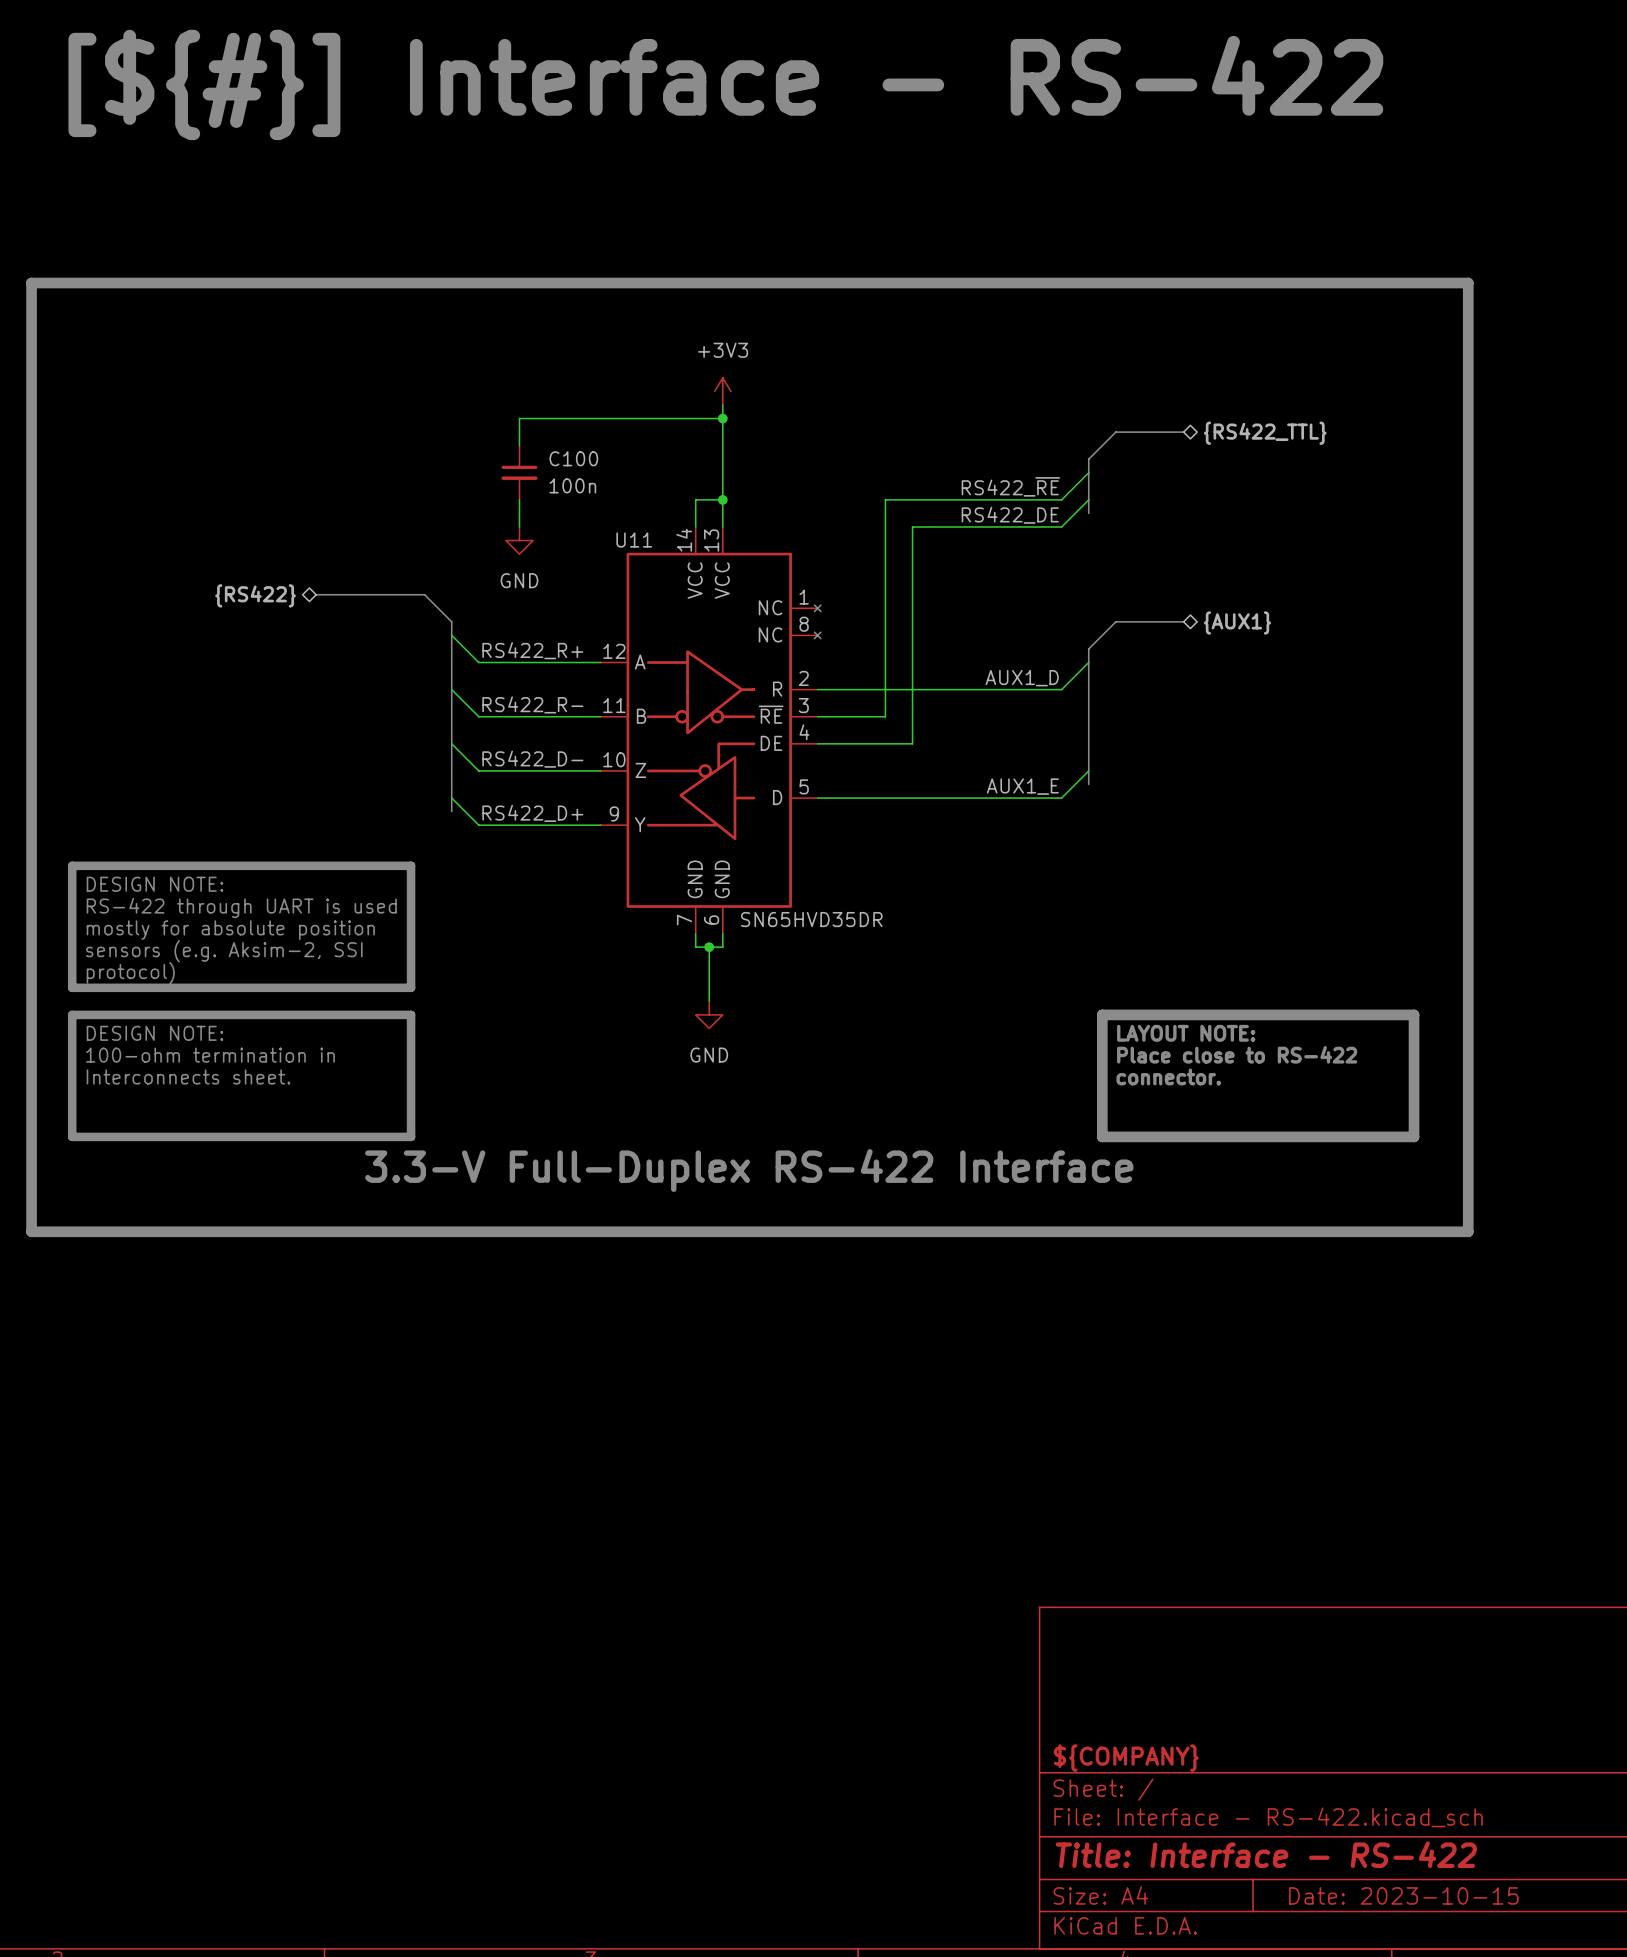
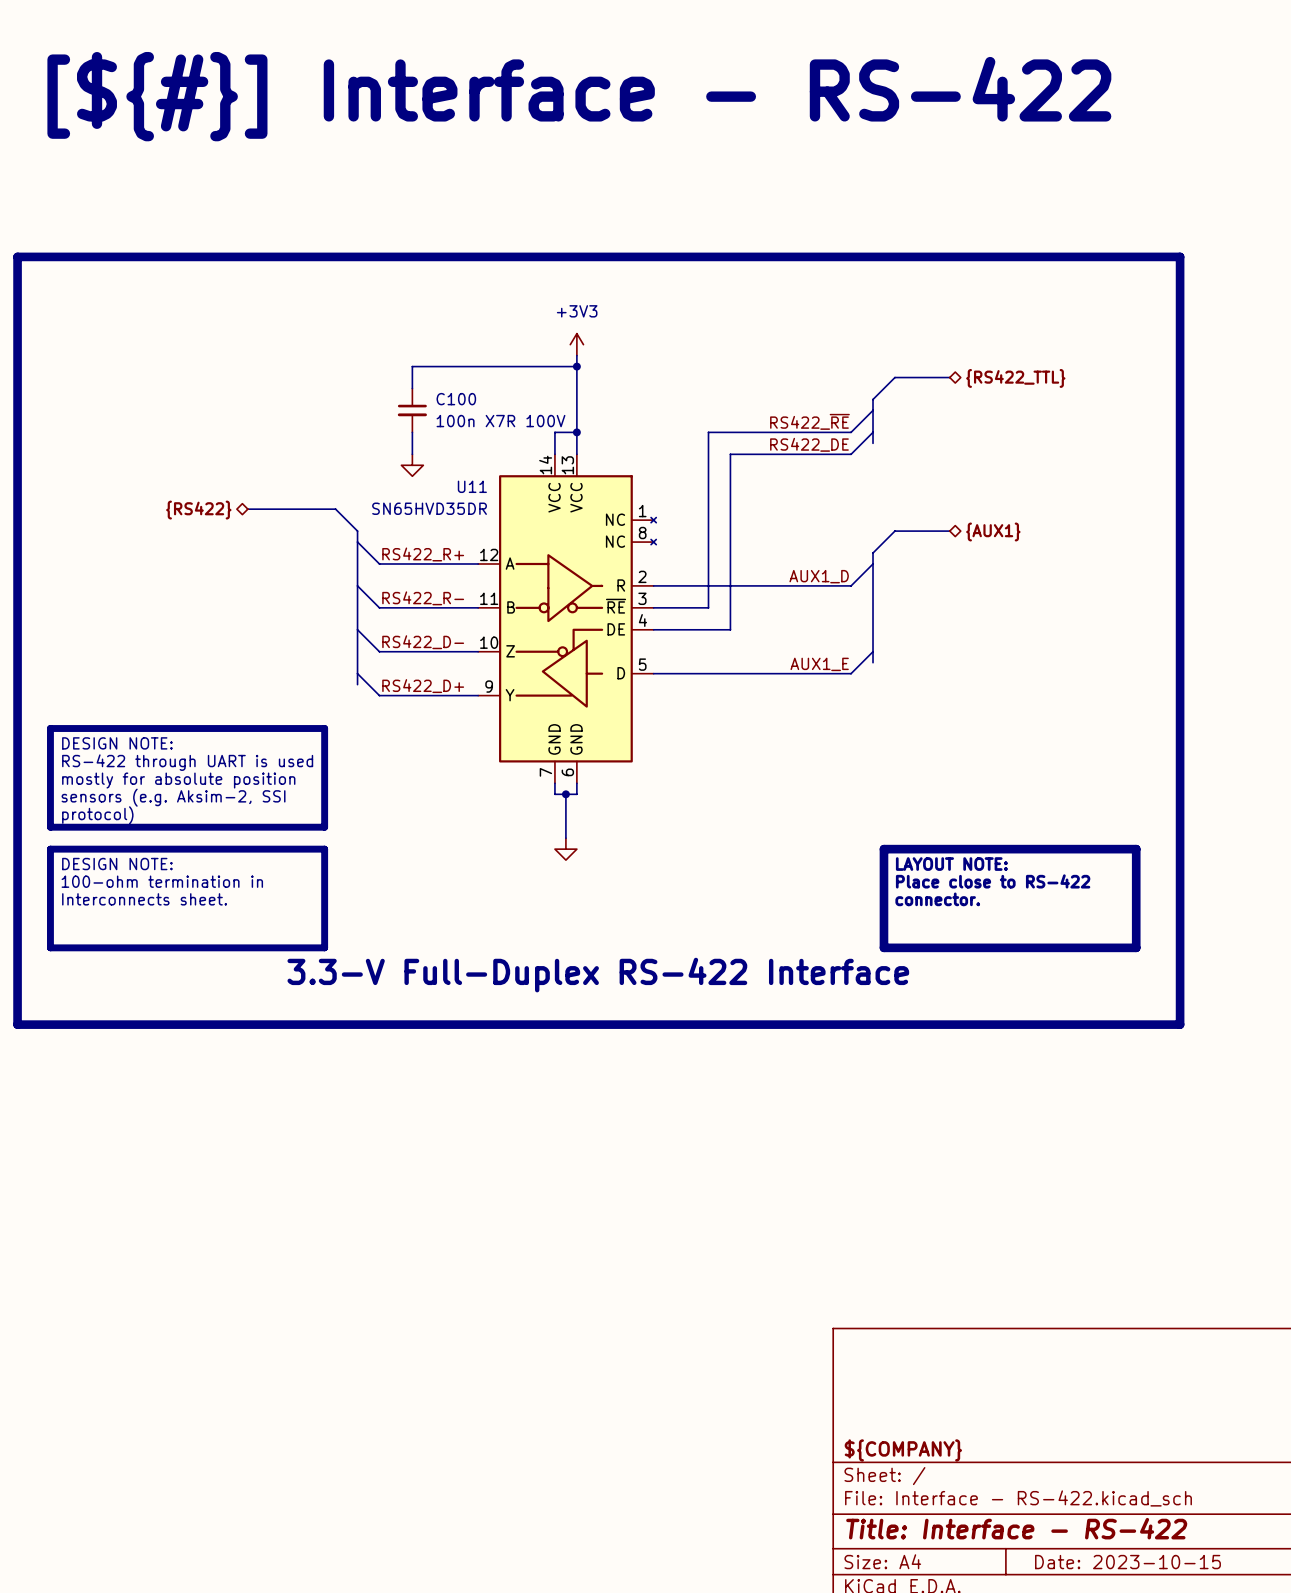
C100 value: 100n (572, 485) -> 100n X7R 100V (500, 421)
U11 name position: U11 (634, 540) -> U11 (472, 486)
power symbol text: GND (519, 580) -> none
U11 value position: SN65HVD35DR (811, 919) -> SN65HVD35DR (429, 508)
power symbol text: GND (709, 1055) -> none

